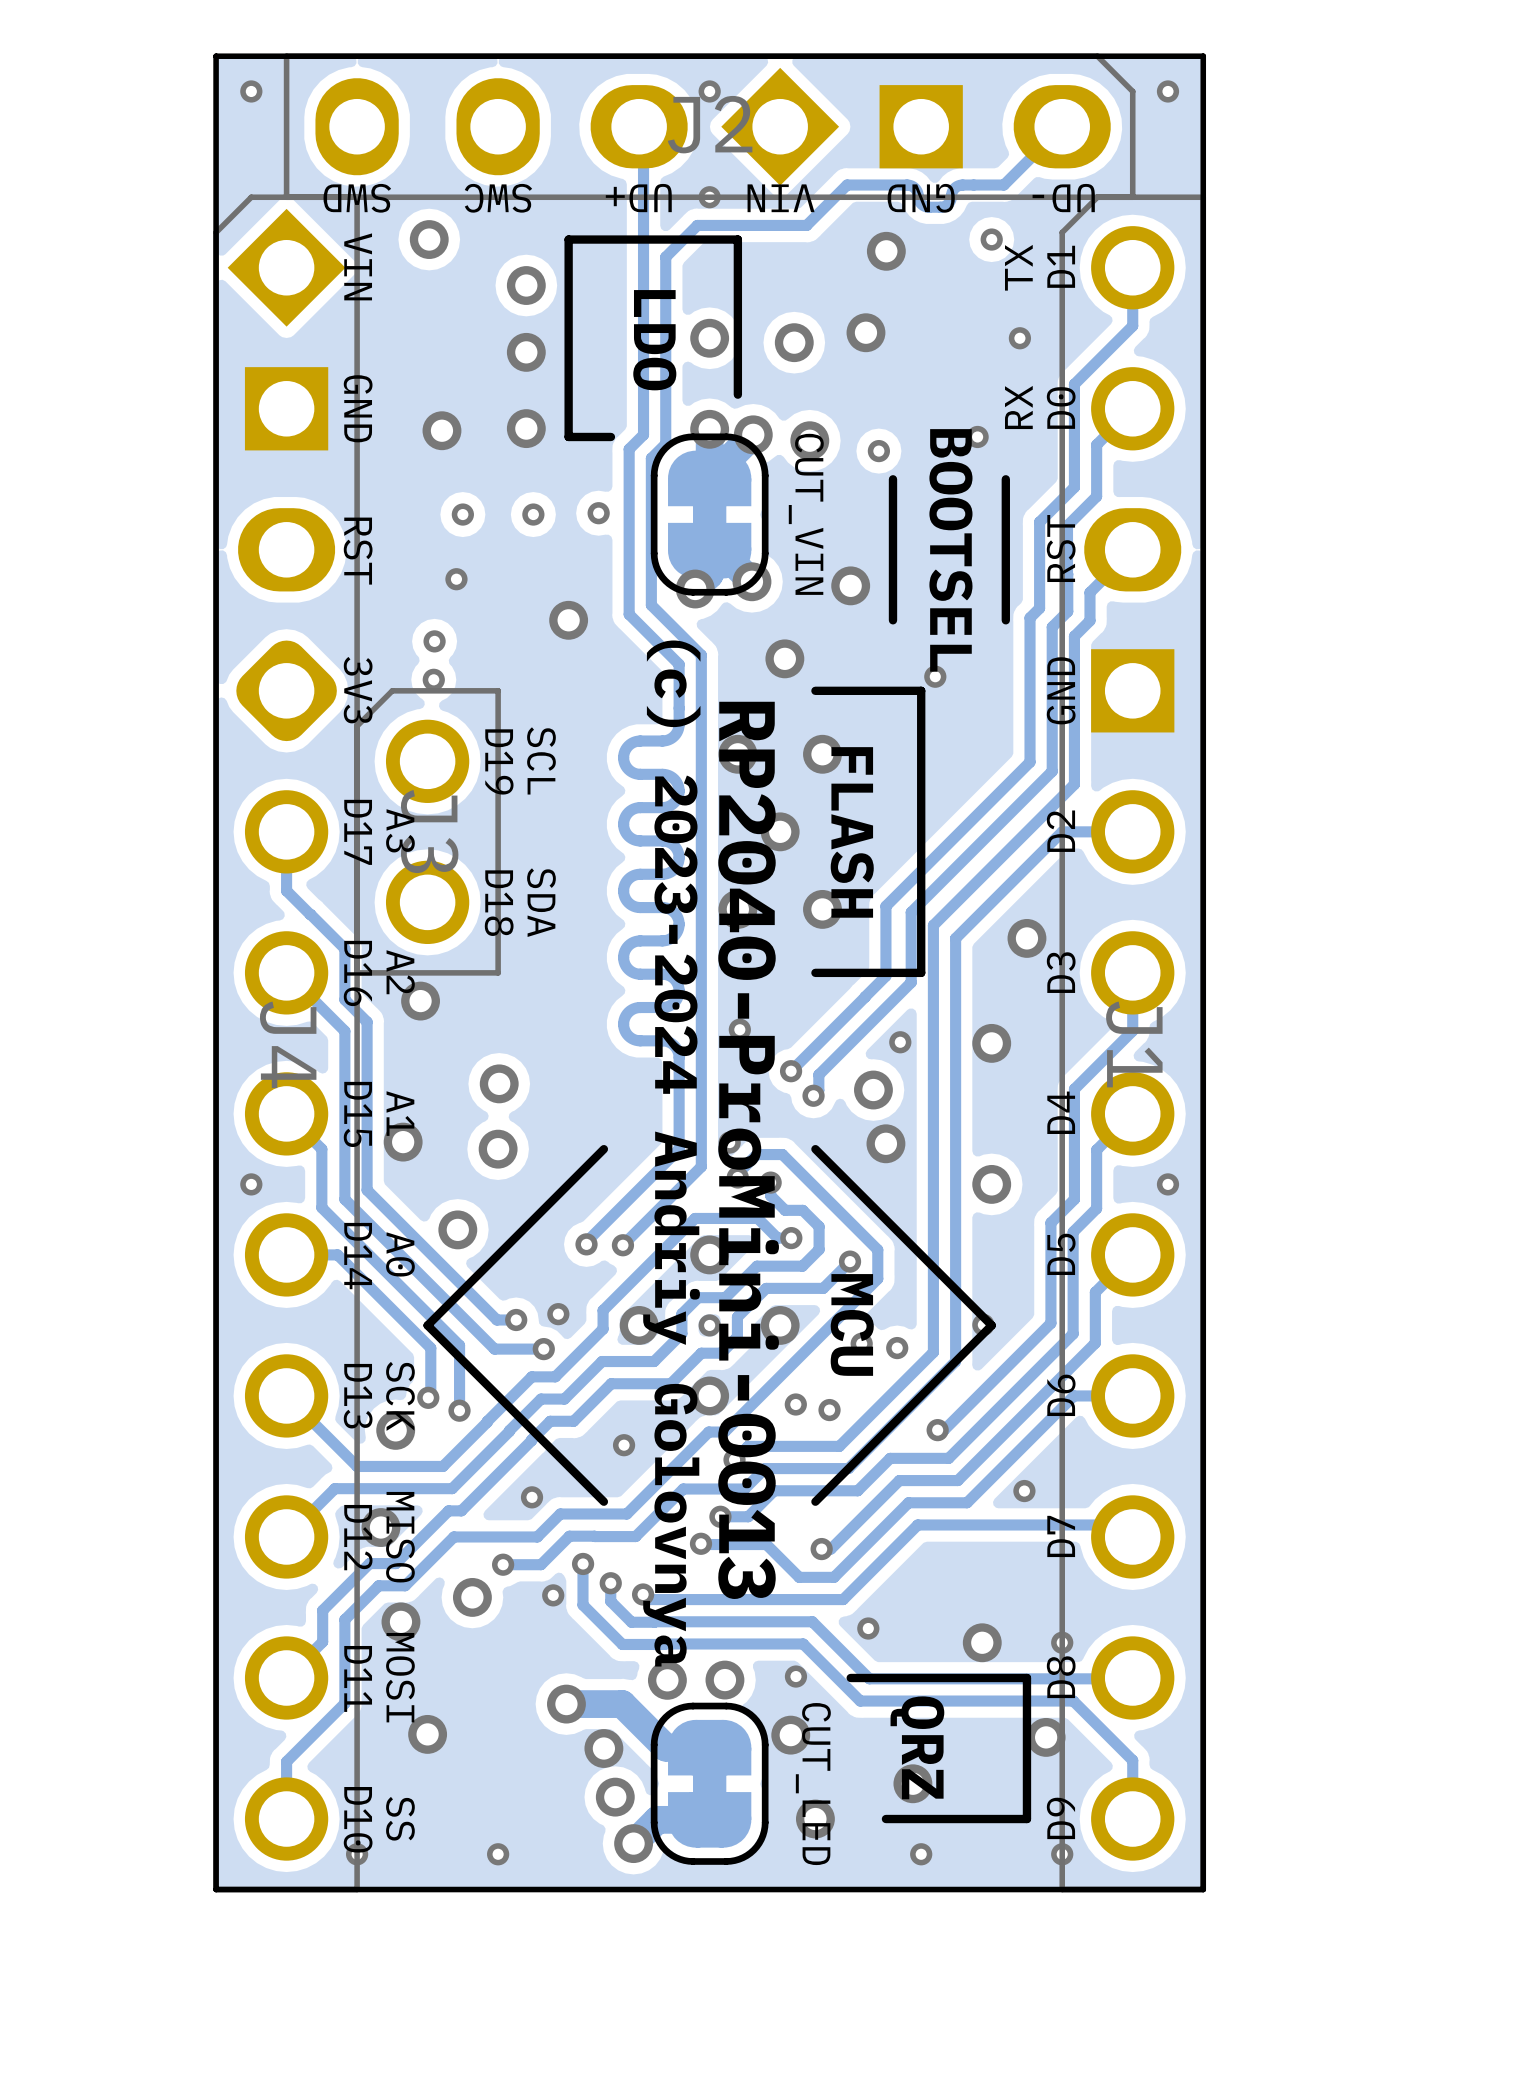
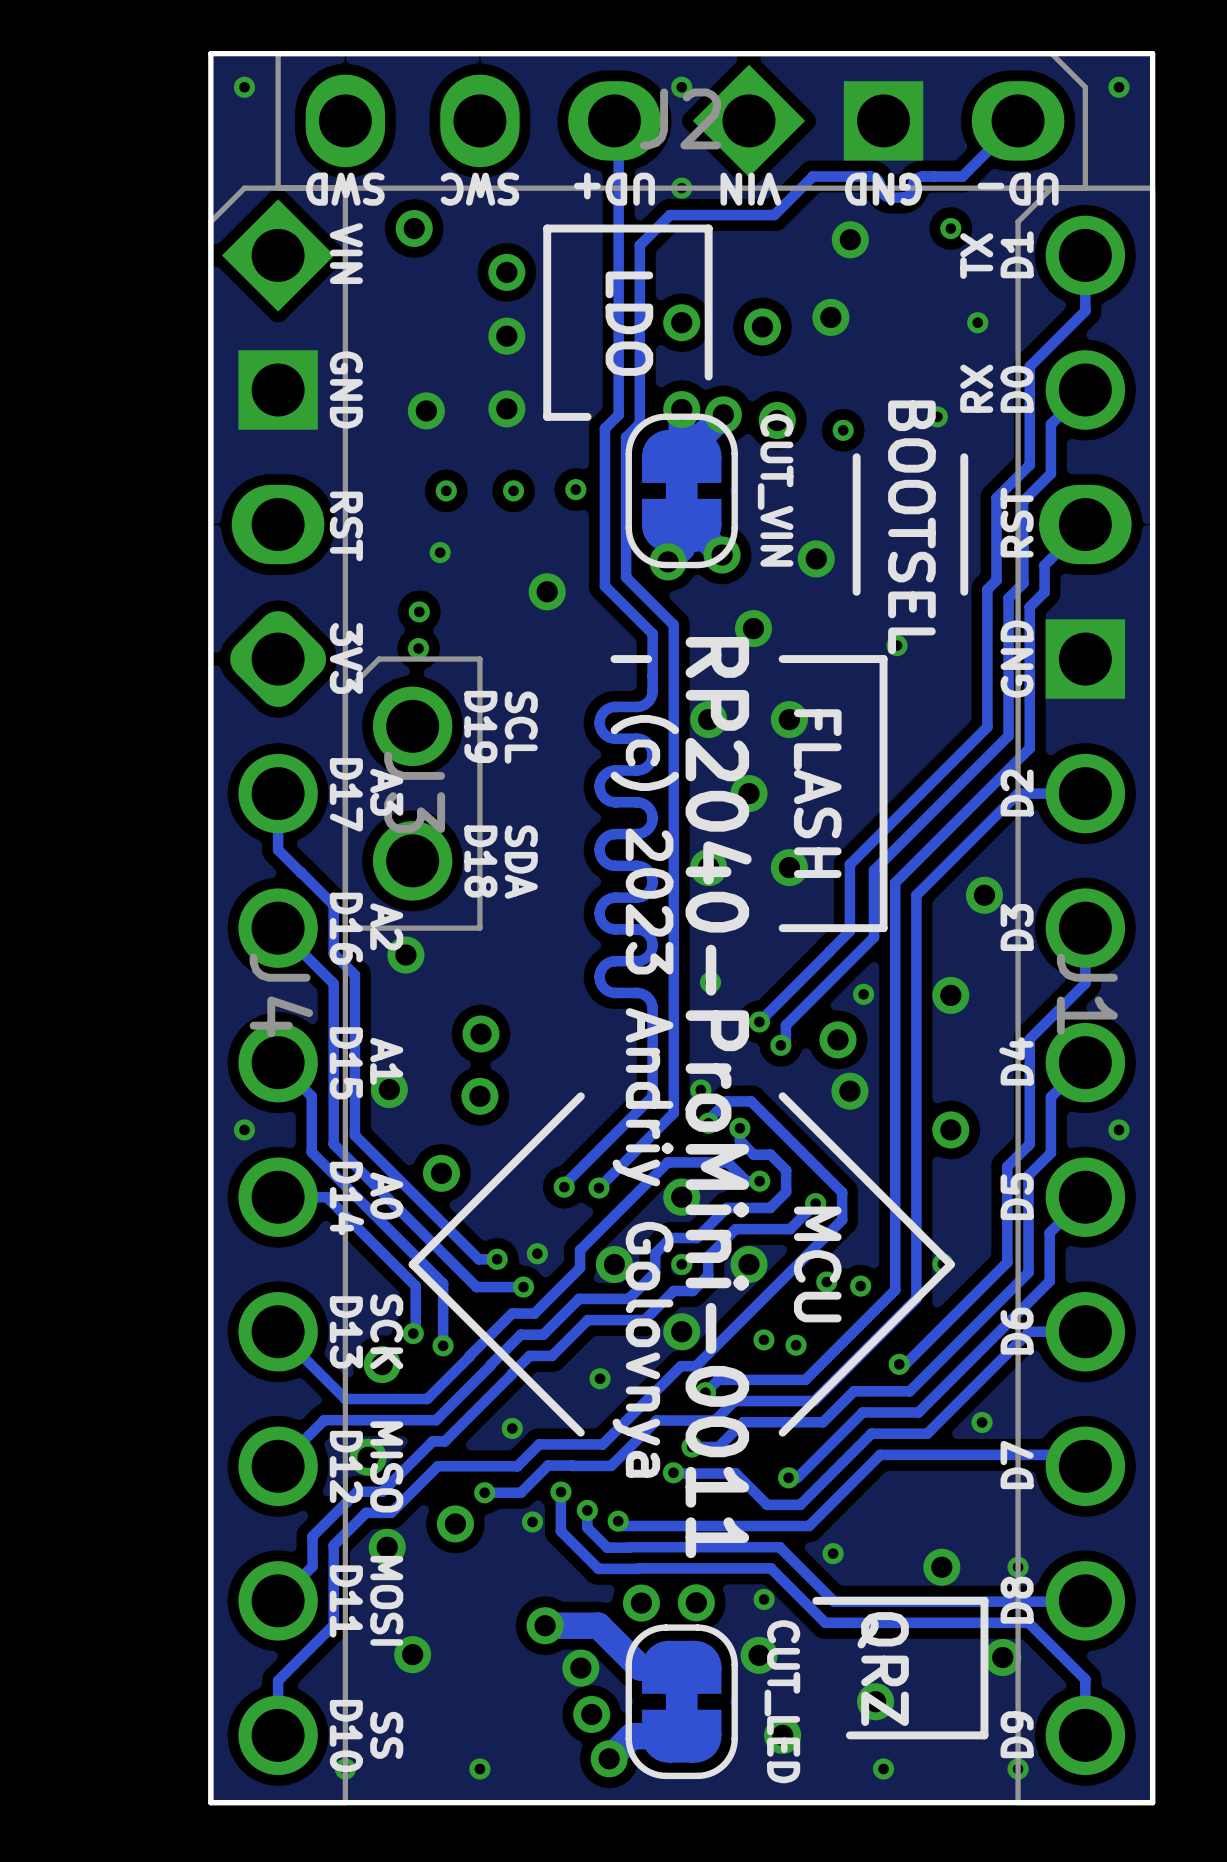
line: none -> (648, 659) (614, 659)
text: RP2040-ProMini-0013 (748, 1150) -> RP2040-ProMini-0011 (718, 1097)
text: (c) 2023-2024 Andriy Golovnya (671, 1153) -> (c) 2023 Andriy Golovnya (644, 1096)

